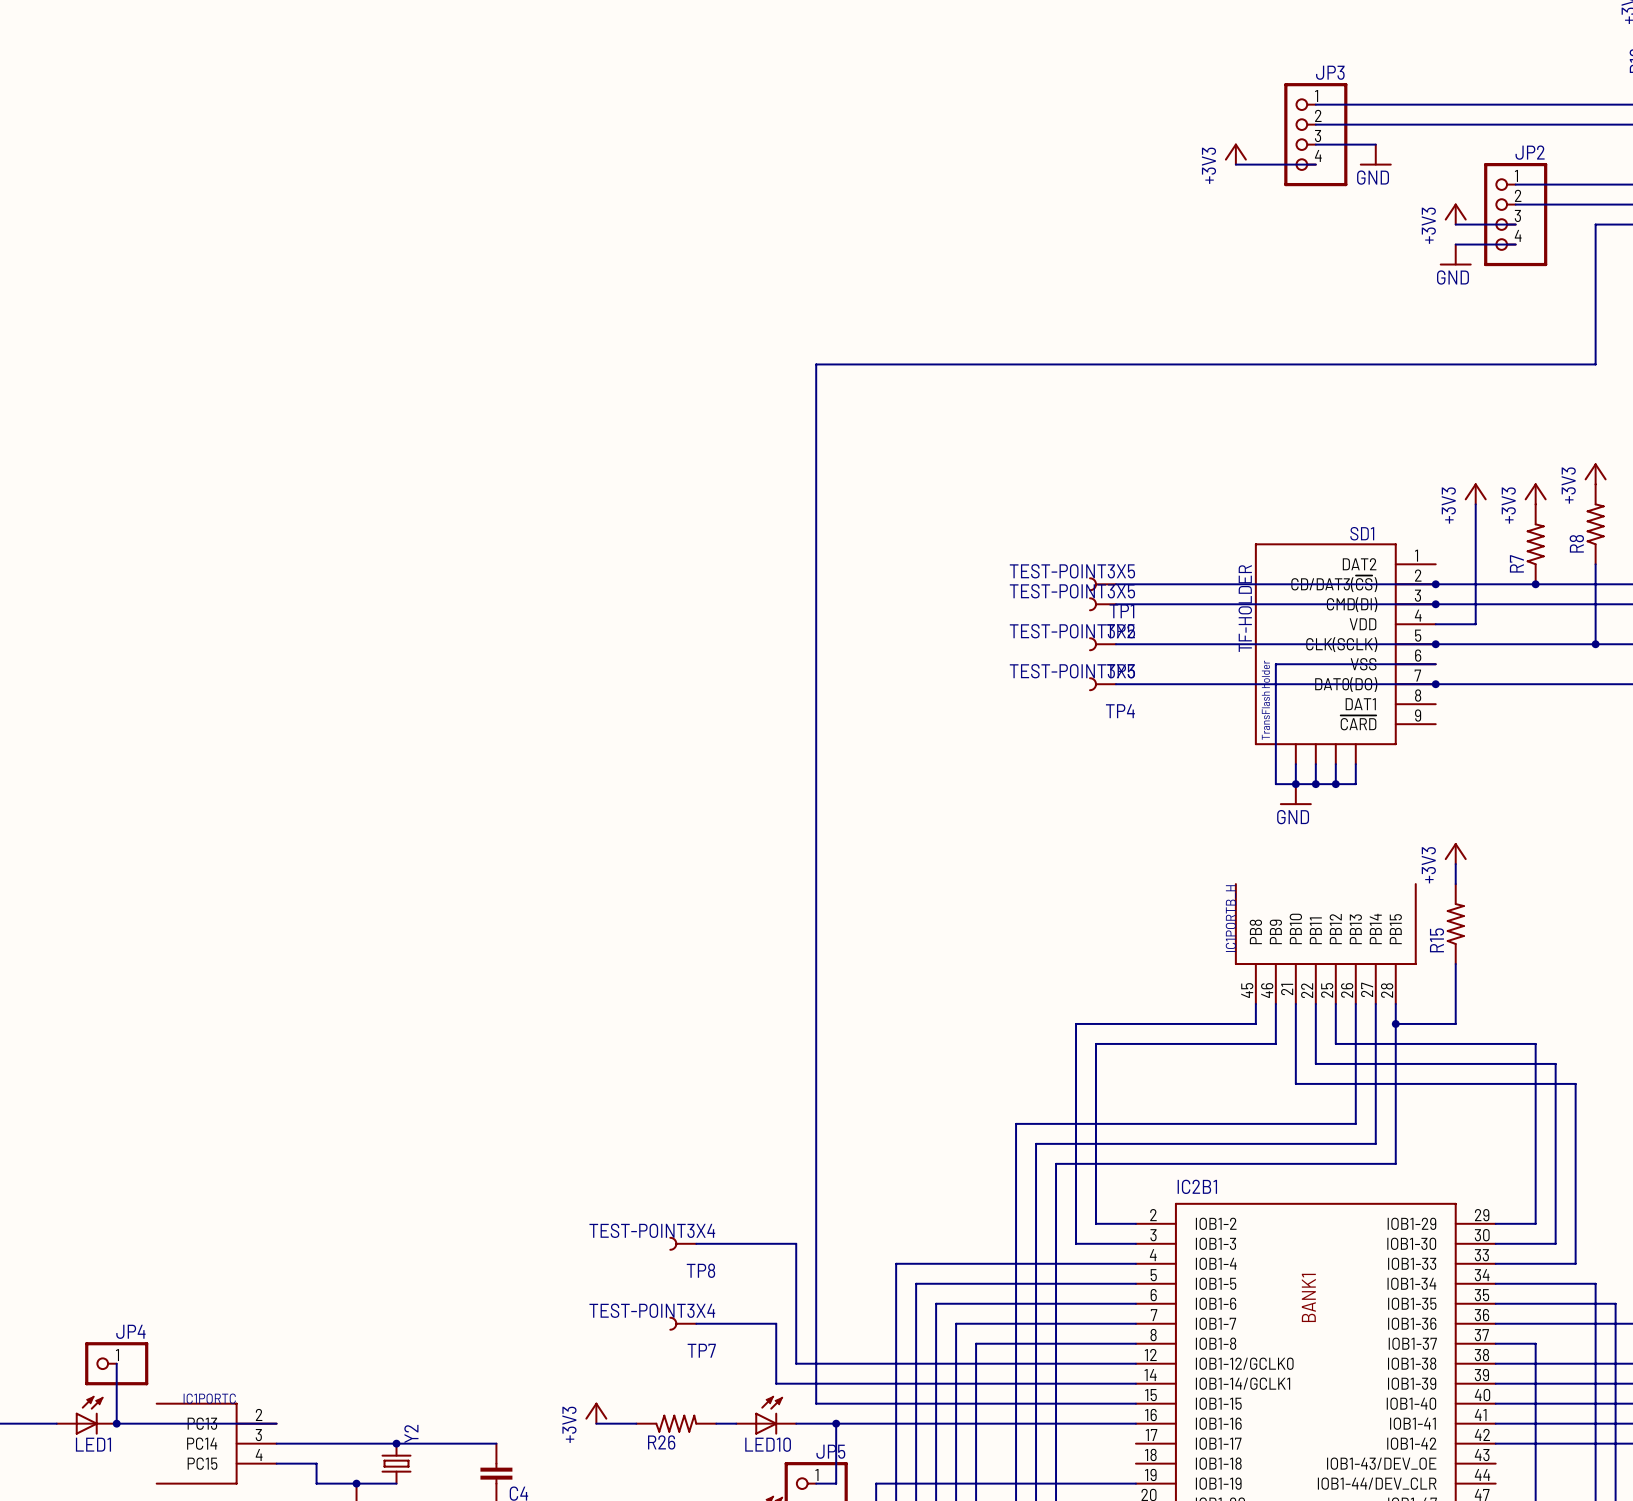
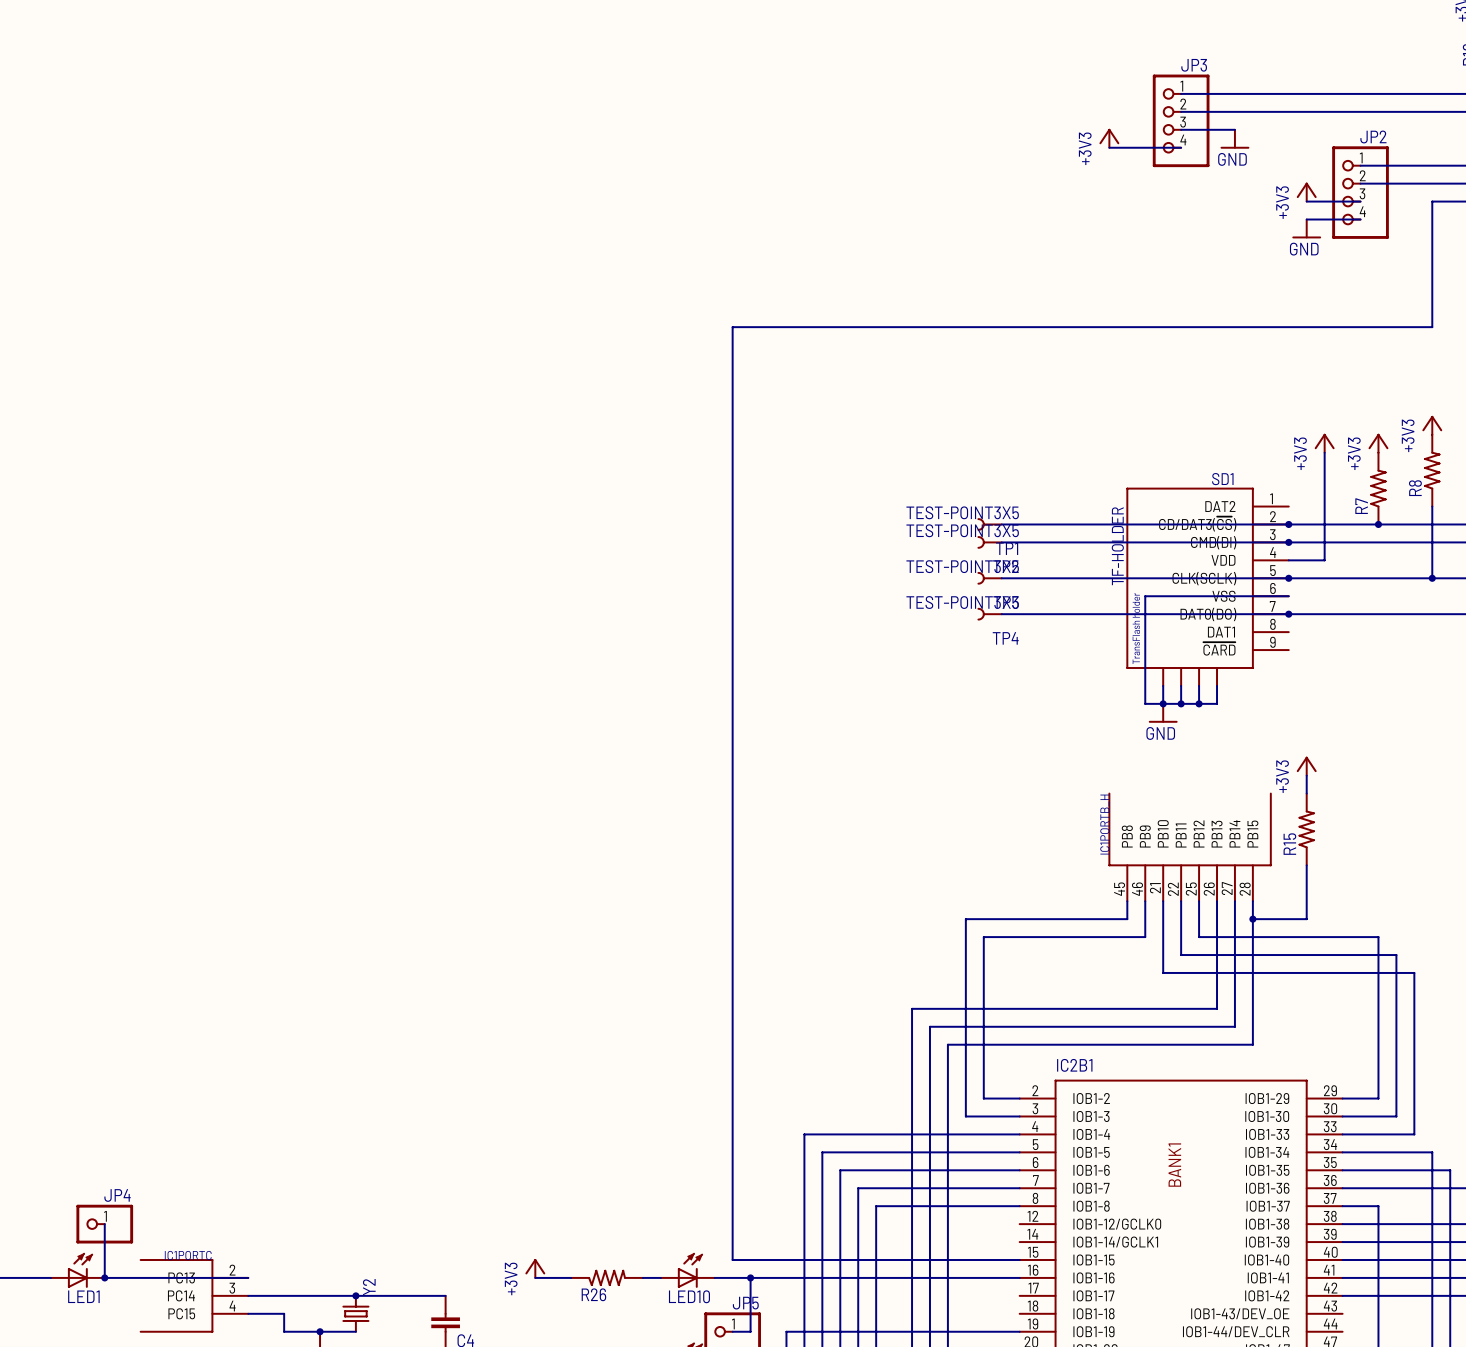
TP8: TEST-POINT3X4 (683, 1243) -> none
wire: (696, 1243) (796, 1243) (796, 1363) (1135, 1363) -> none
TP7: TEST-POINT3X4 (683, 1323) -> none
wire: (696, 1323) (776, 1323) (776, 1383) (1135, 1383) -> none

